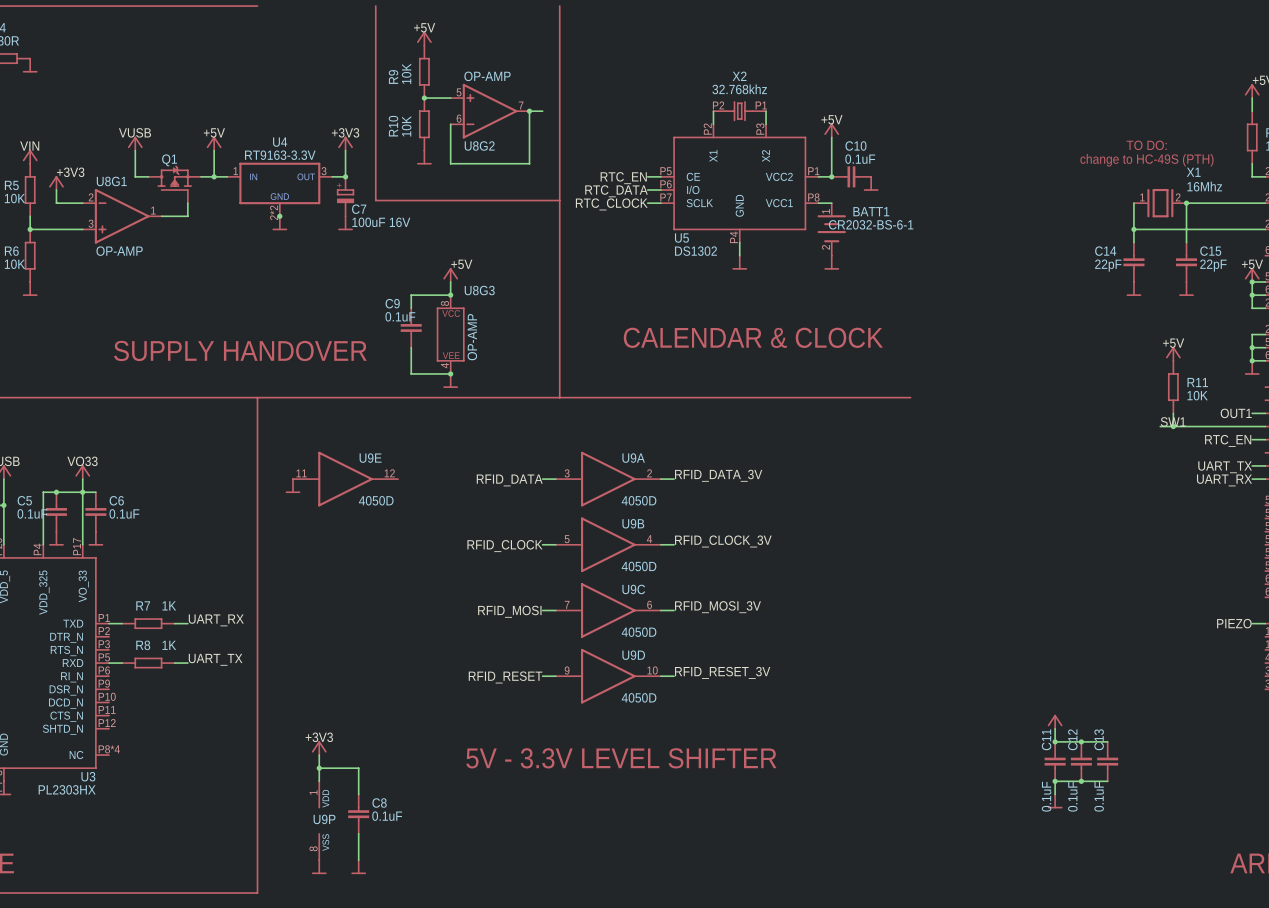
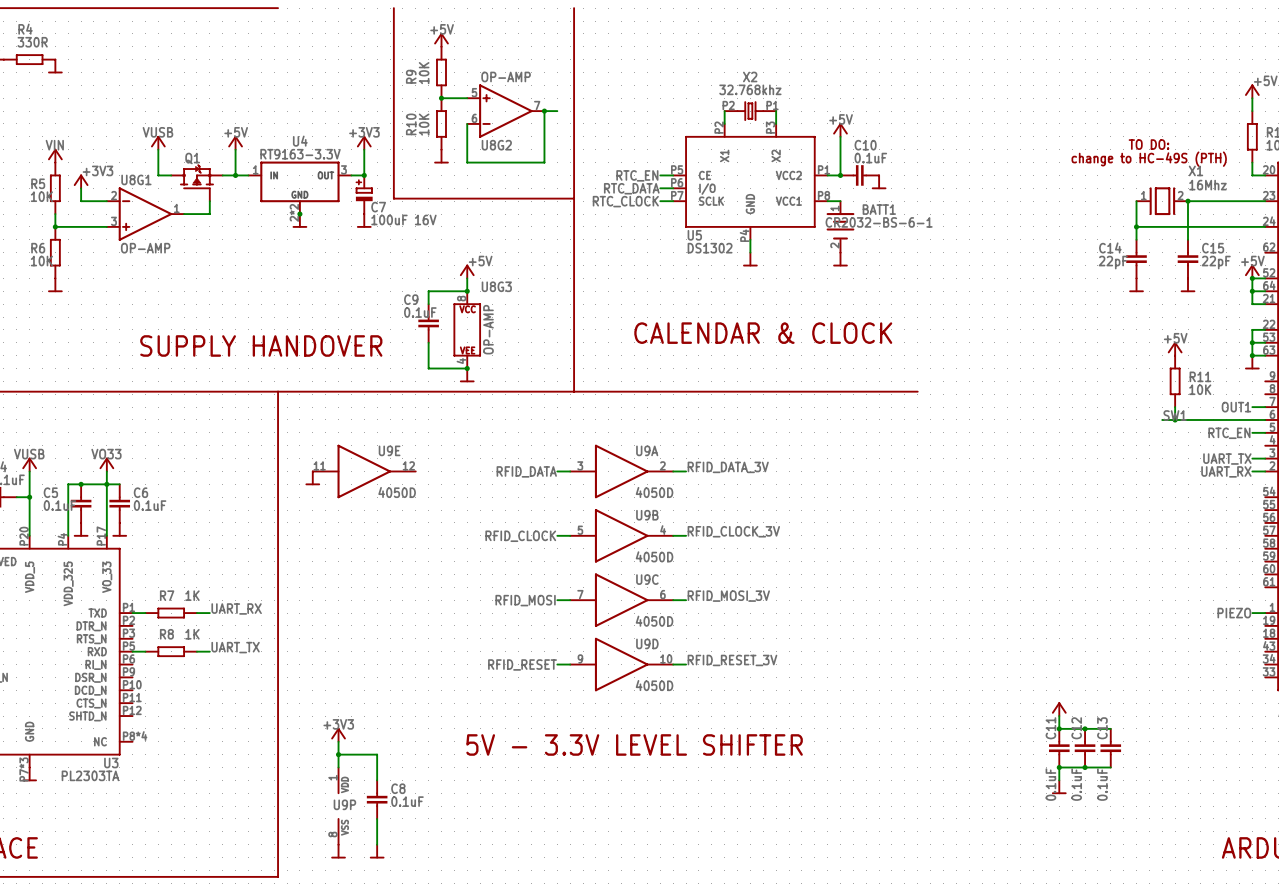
U3 value: PL2303HX (67, 789) -> PL2303TA (90, 775)

